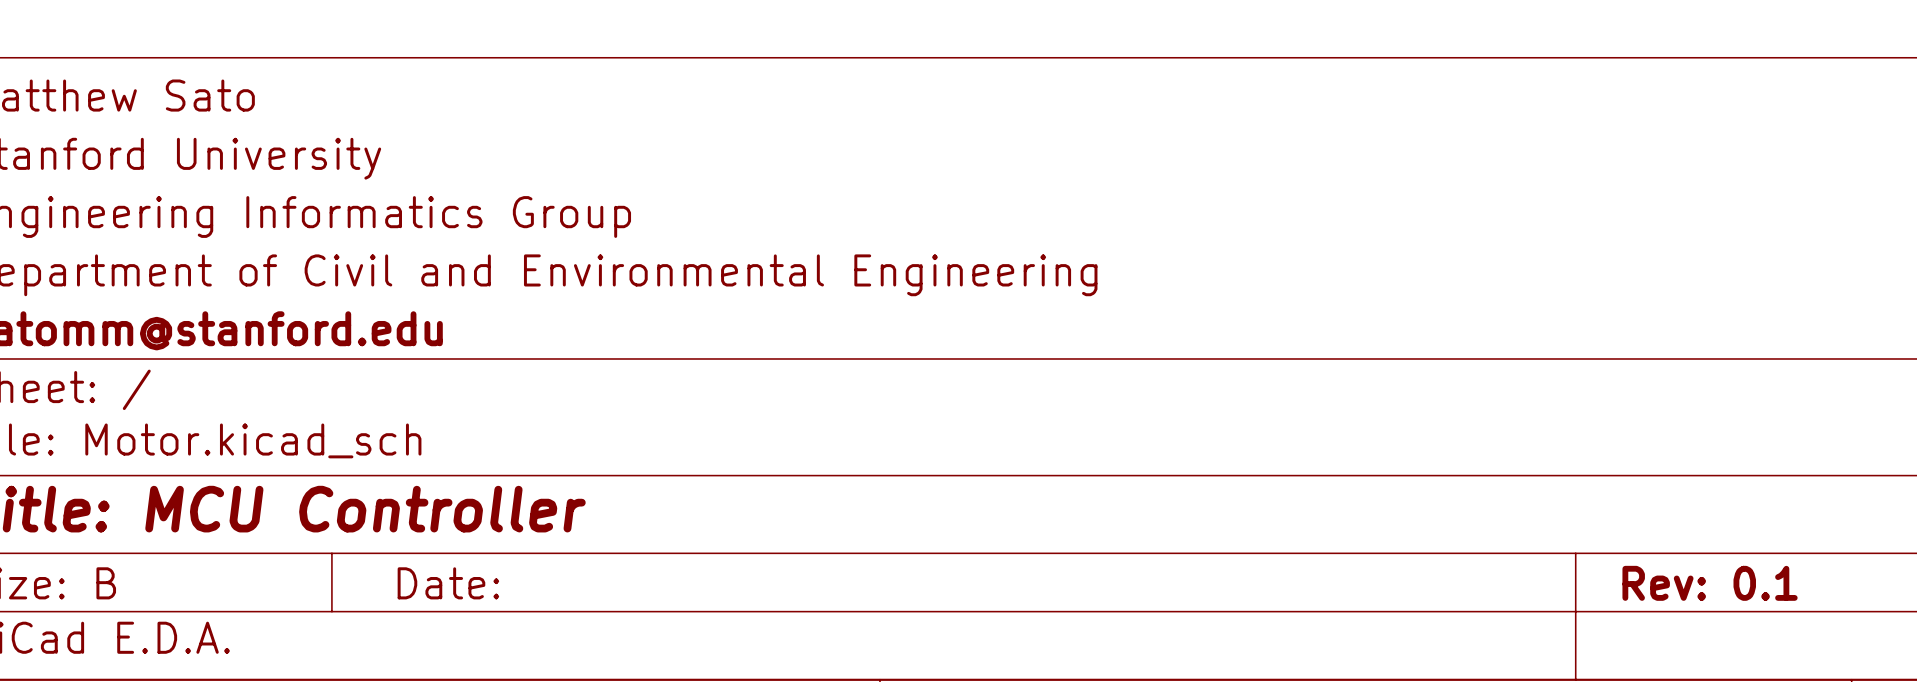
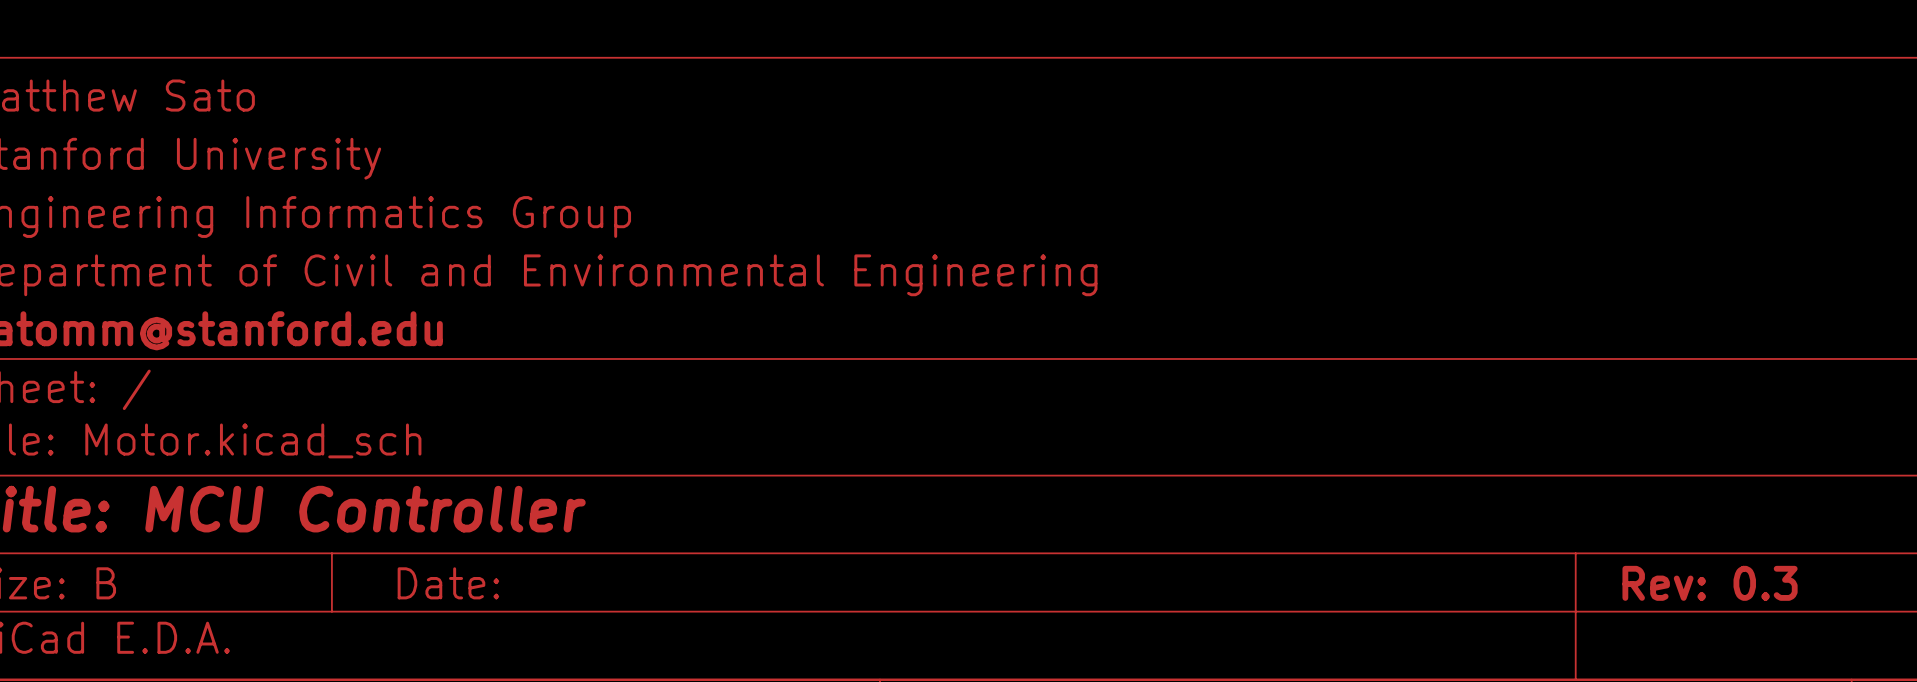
title block: Rev: 0.1 (1710, 583) -> Rev: 0.3 (1710, 583)

